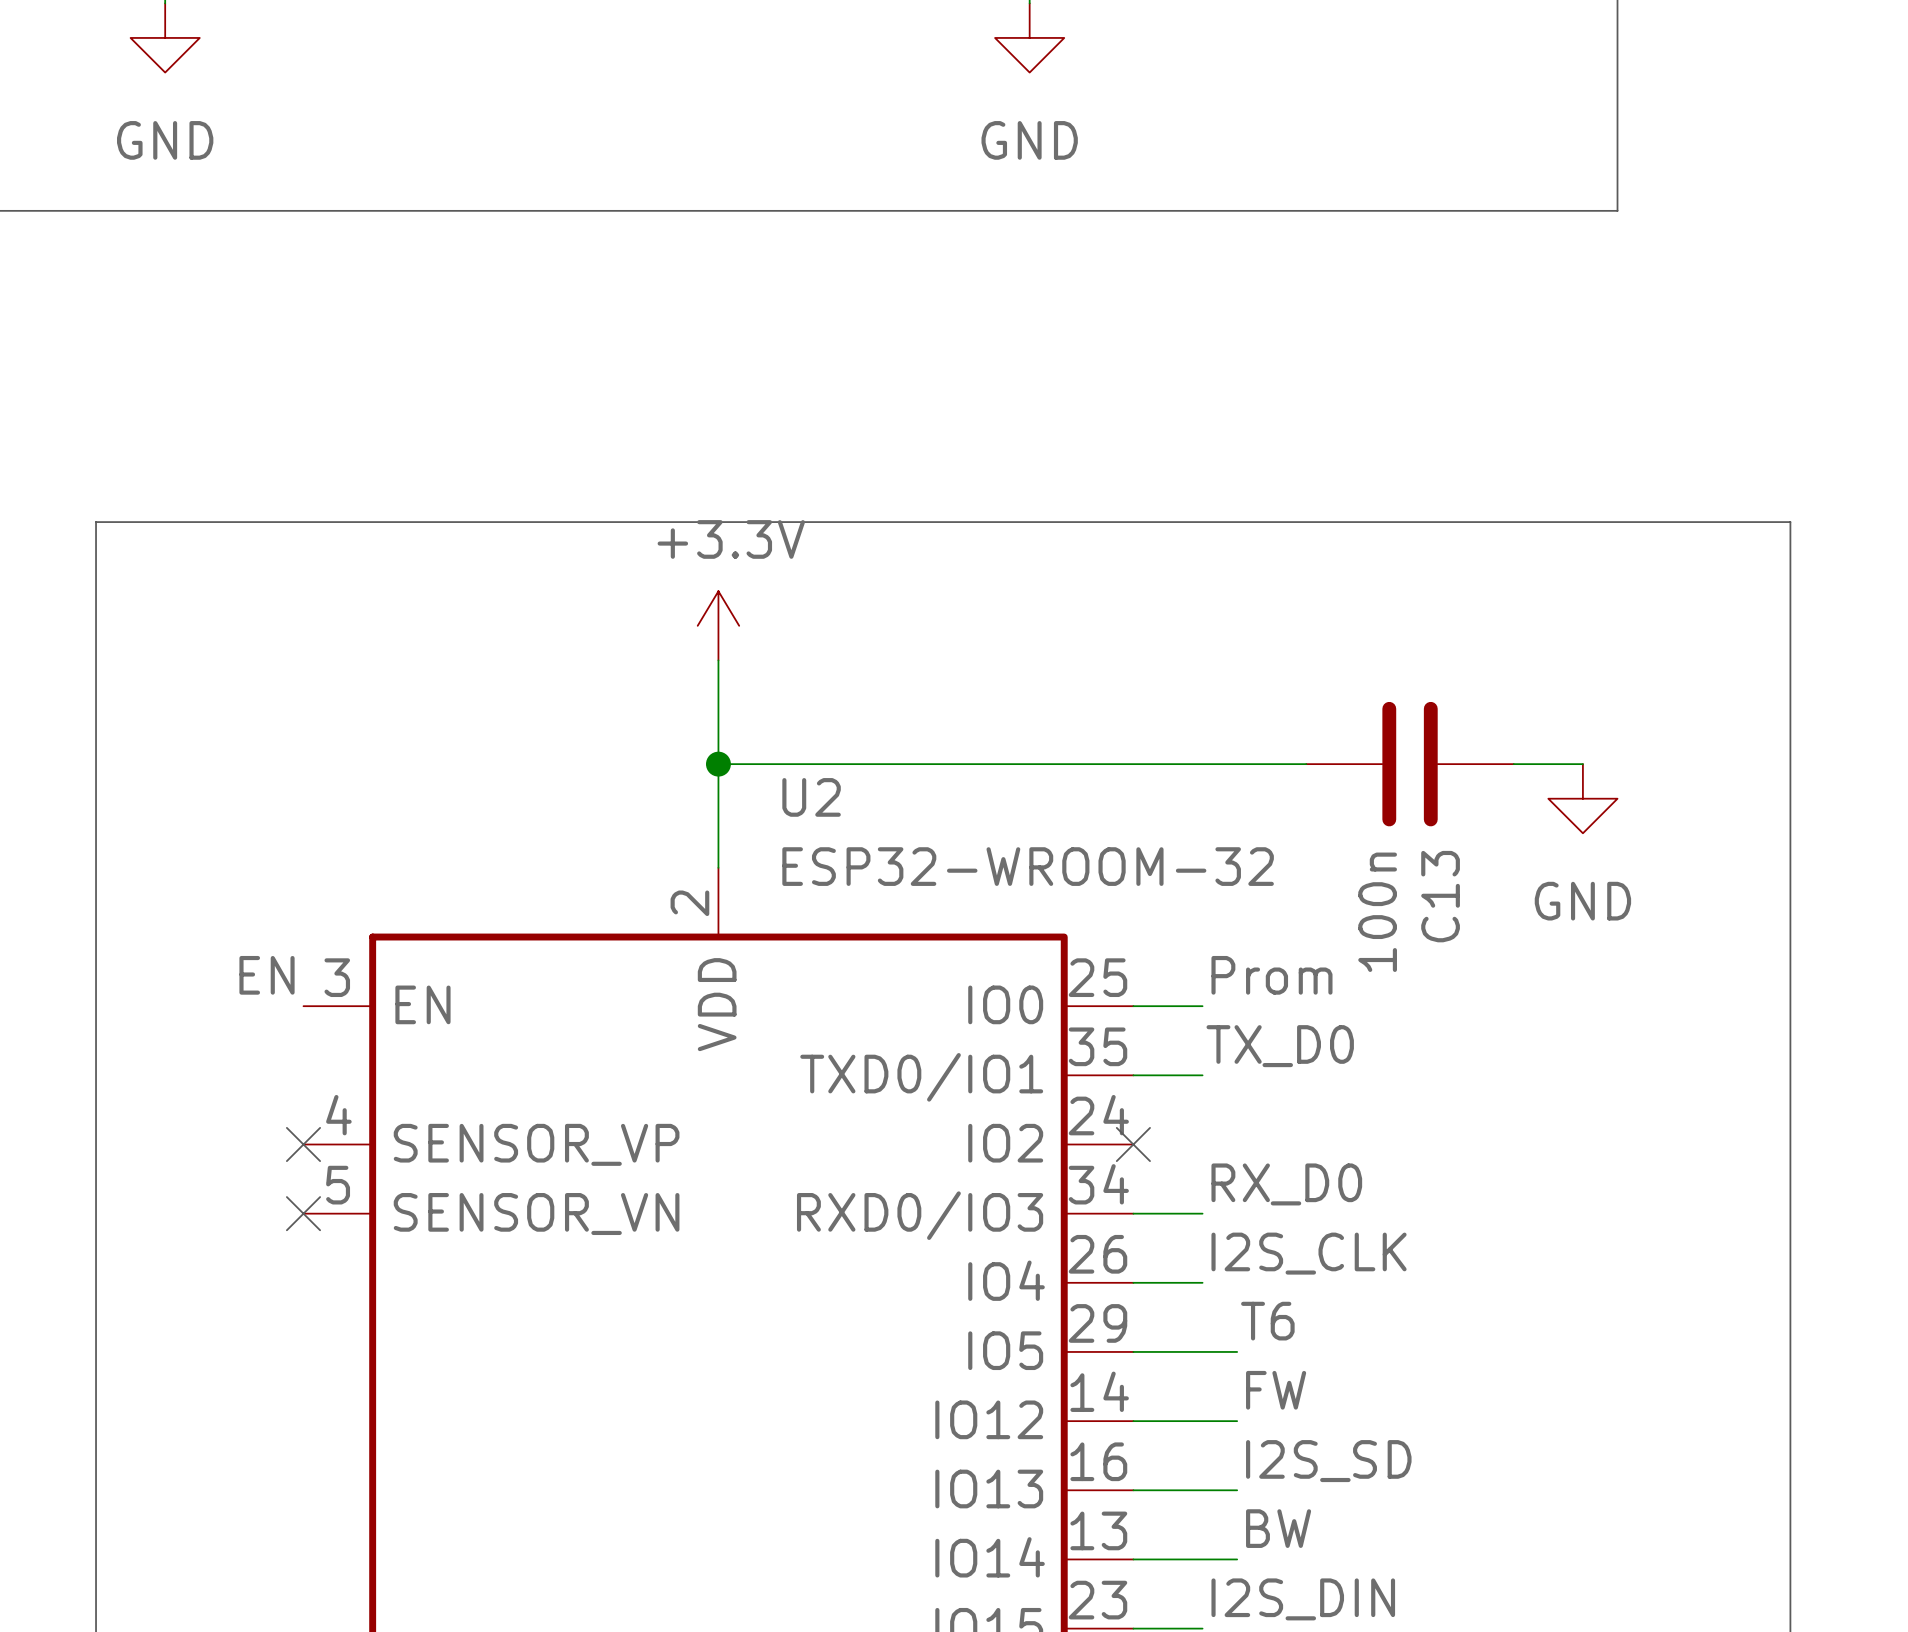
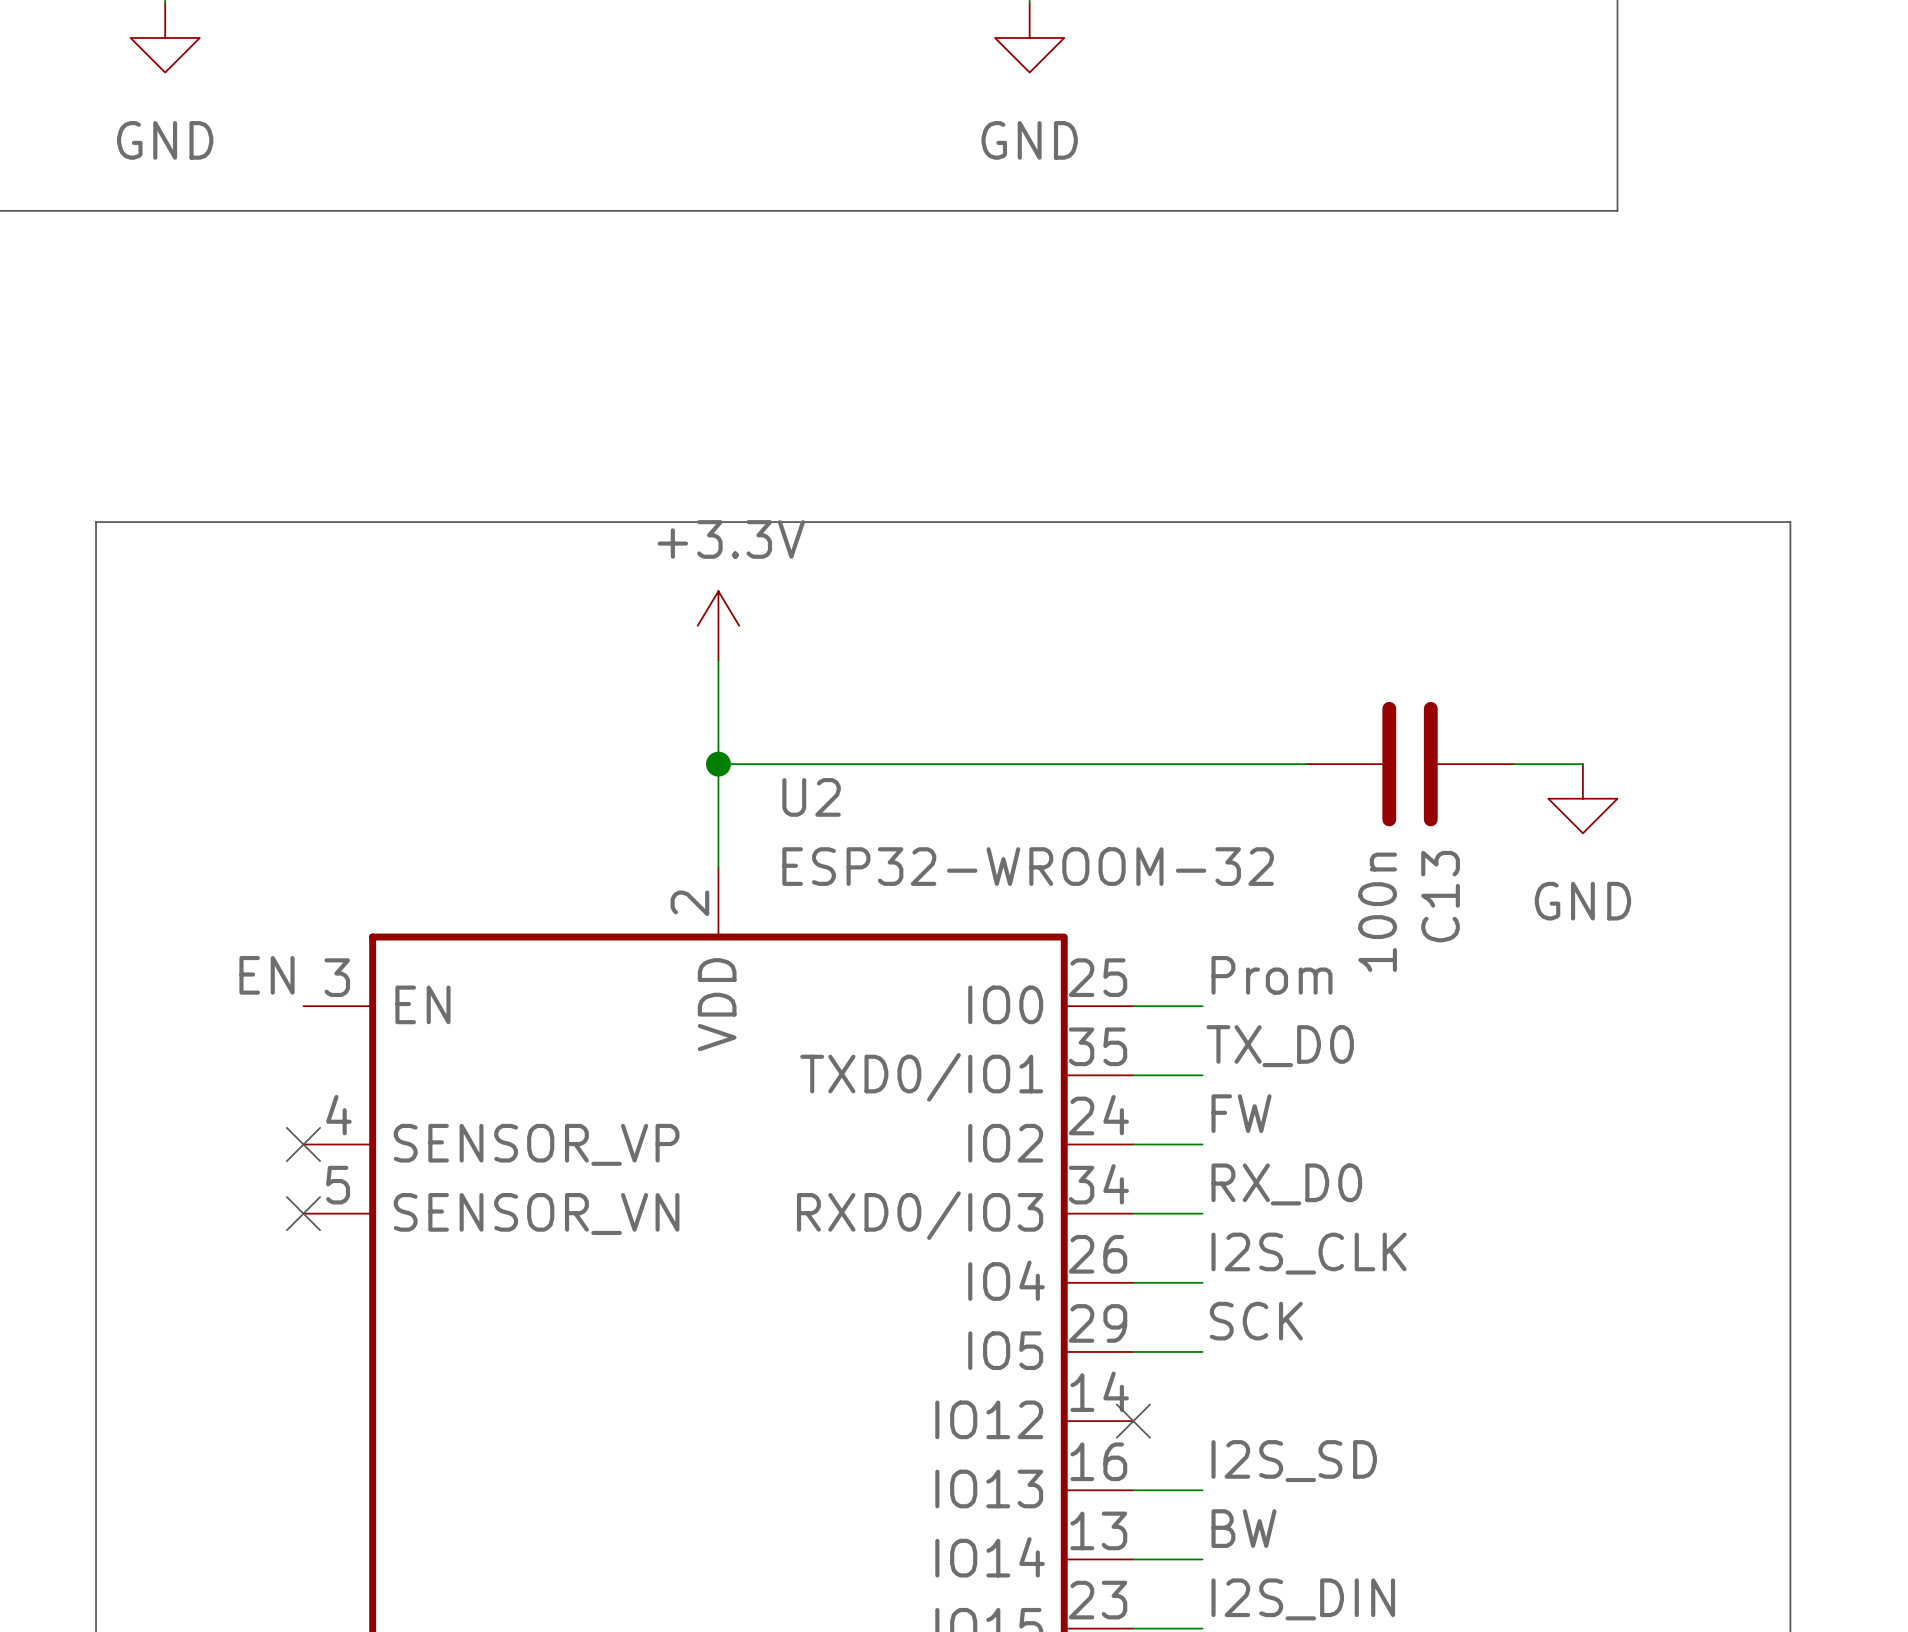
wire: none -> (1133, 1144) (1202, 1144)
no-connect mark: (1133, 1144) -> none
label: none -> SCK (1256, 1321)
label: T6 (1267, 1321) -> none
wire: (1202, 1351) (1237, 1351) -> none
label position: FW (1276, 1390) -> FW (1241, 1113)
wire: (1133, 1421) (1237, 1421) -> none
no-connect mark: none -> (1133, 1421)
label position: I2S_SD (1328, 1461) -> I2S_SD (1294, 1461)
wire: (1202, 1490) (1237, 1490) -> none
label position: BW (1278, 1528) -> BW (1243, 1528)
wire: (1202, 1559) (1237, 1559) -> none

